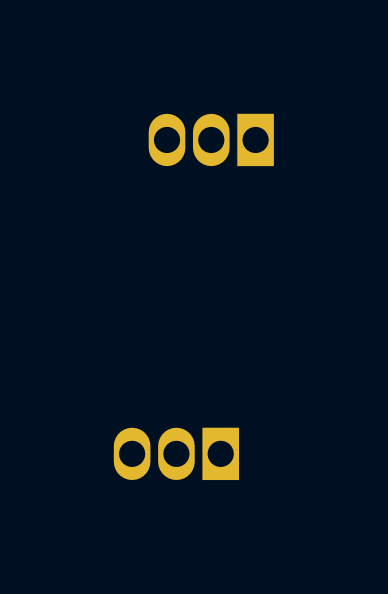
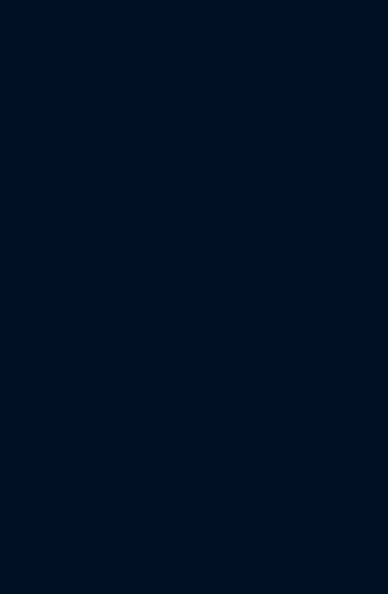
part: (211, 139) -> none
part: (176, 453) -> none

